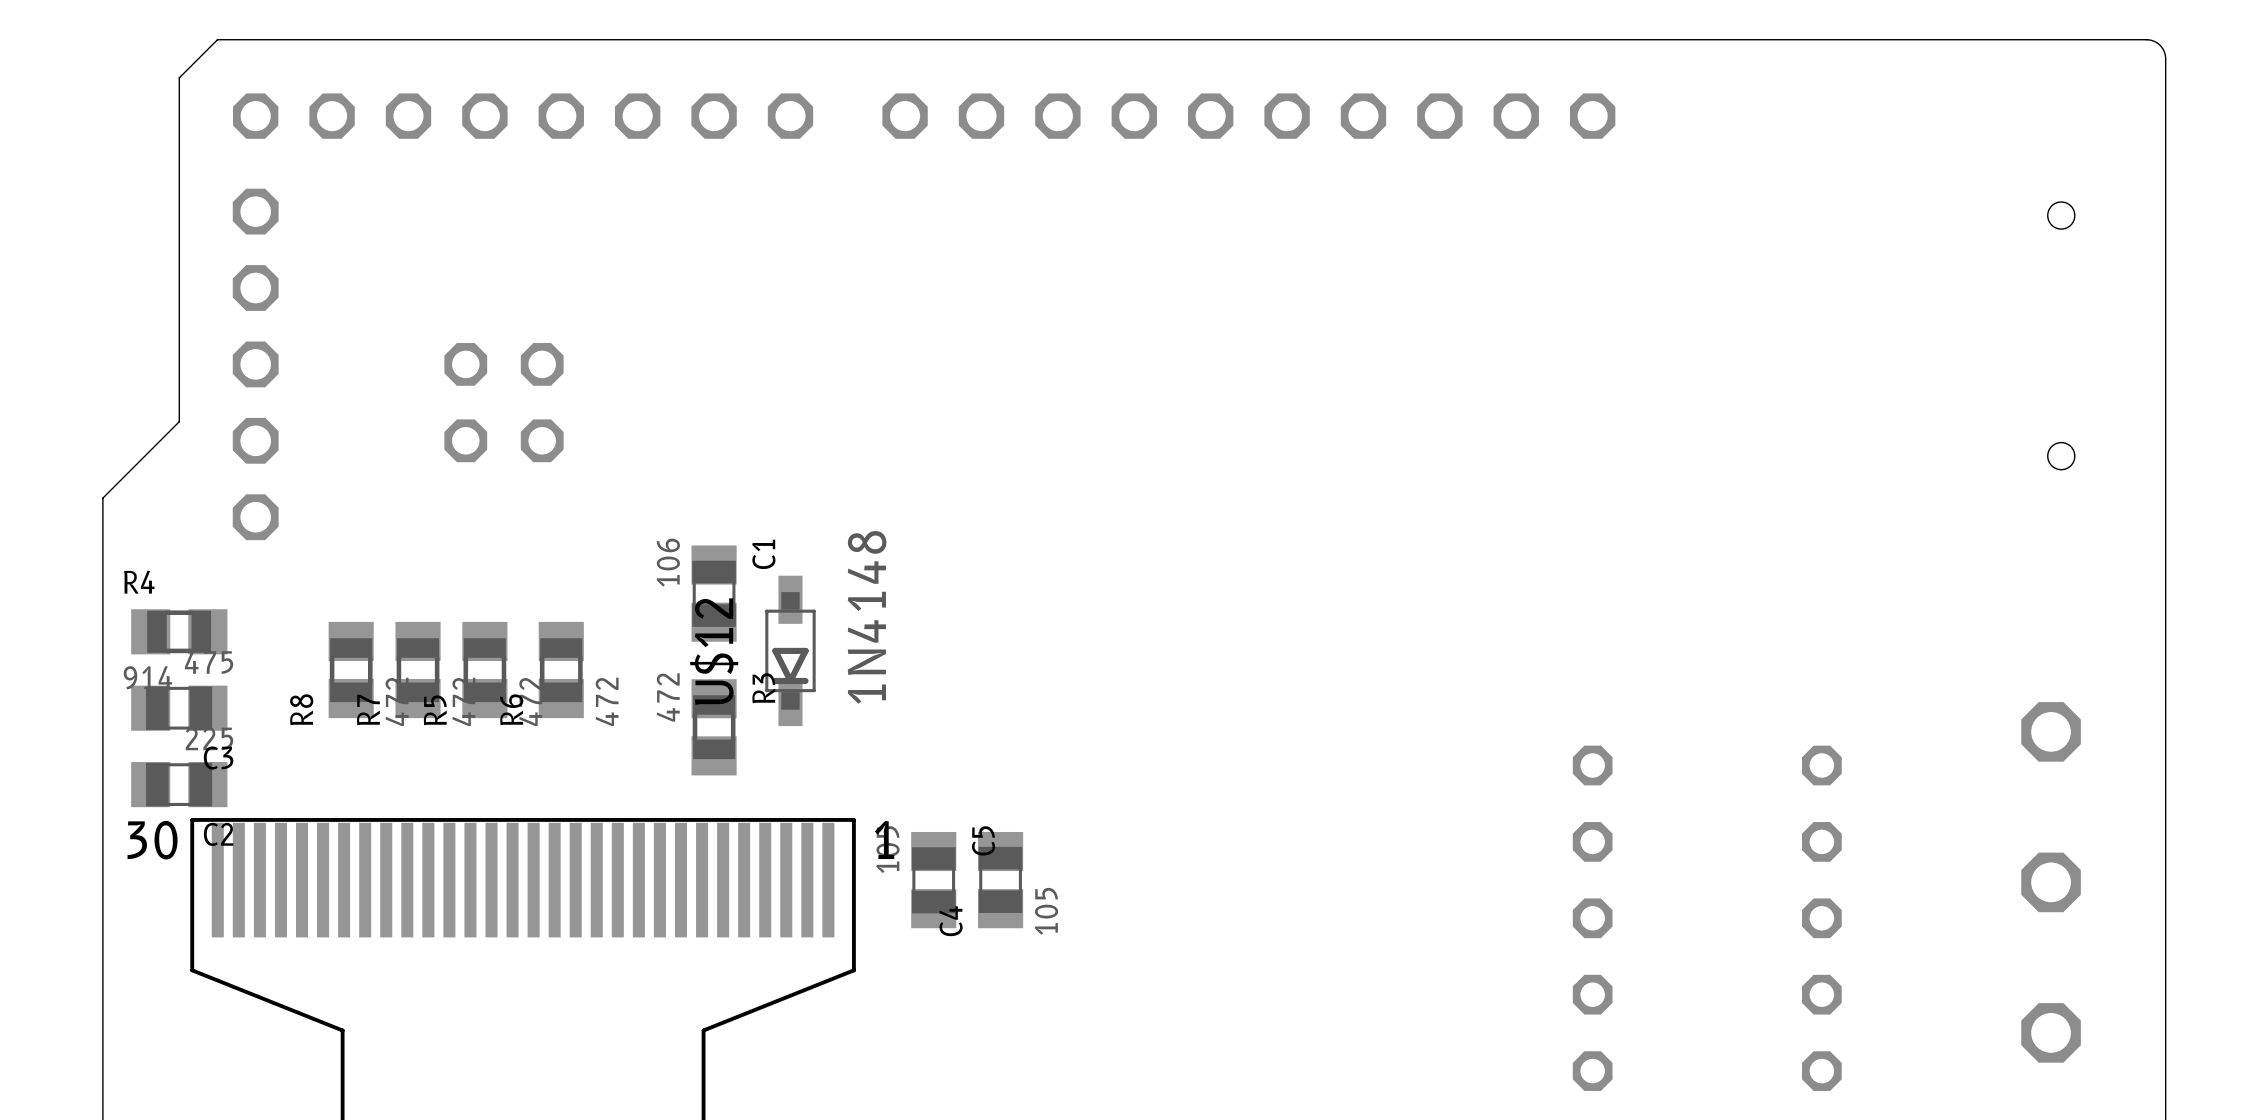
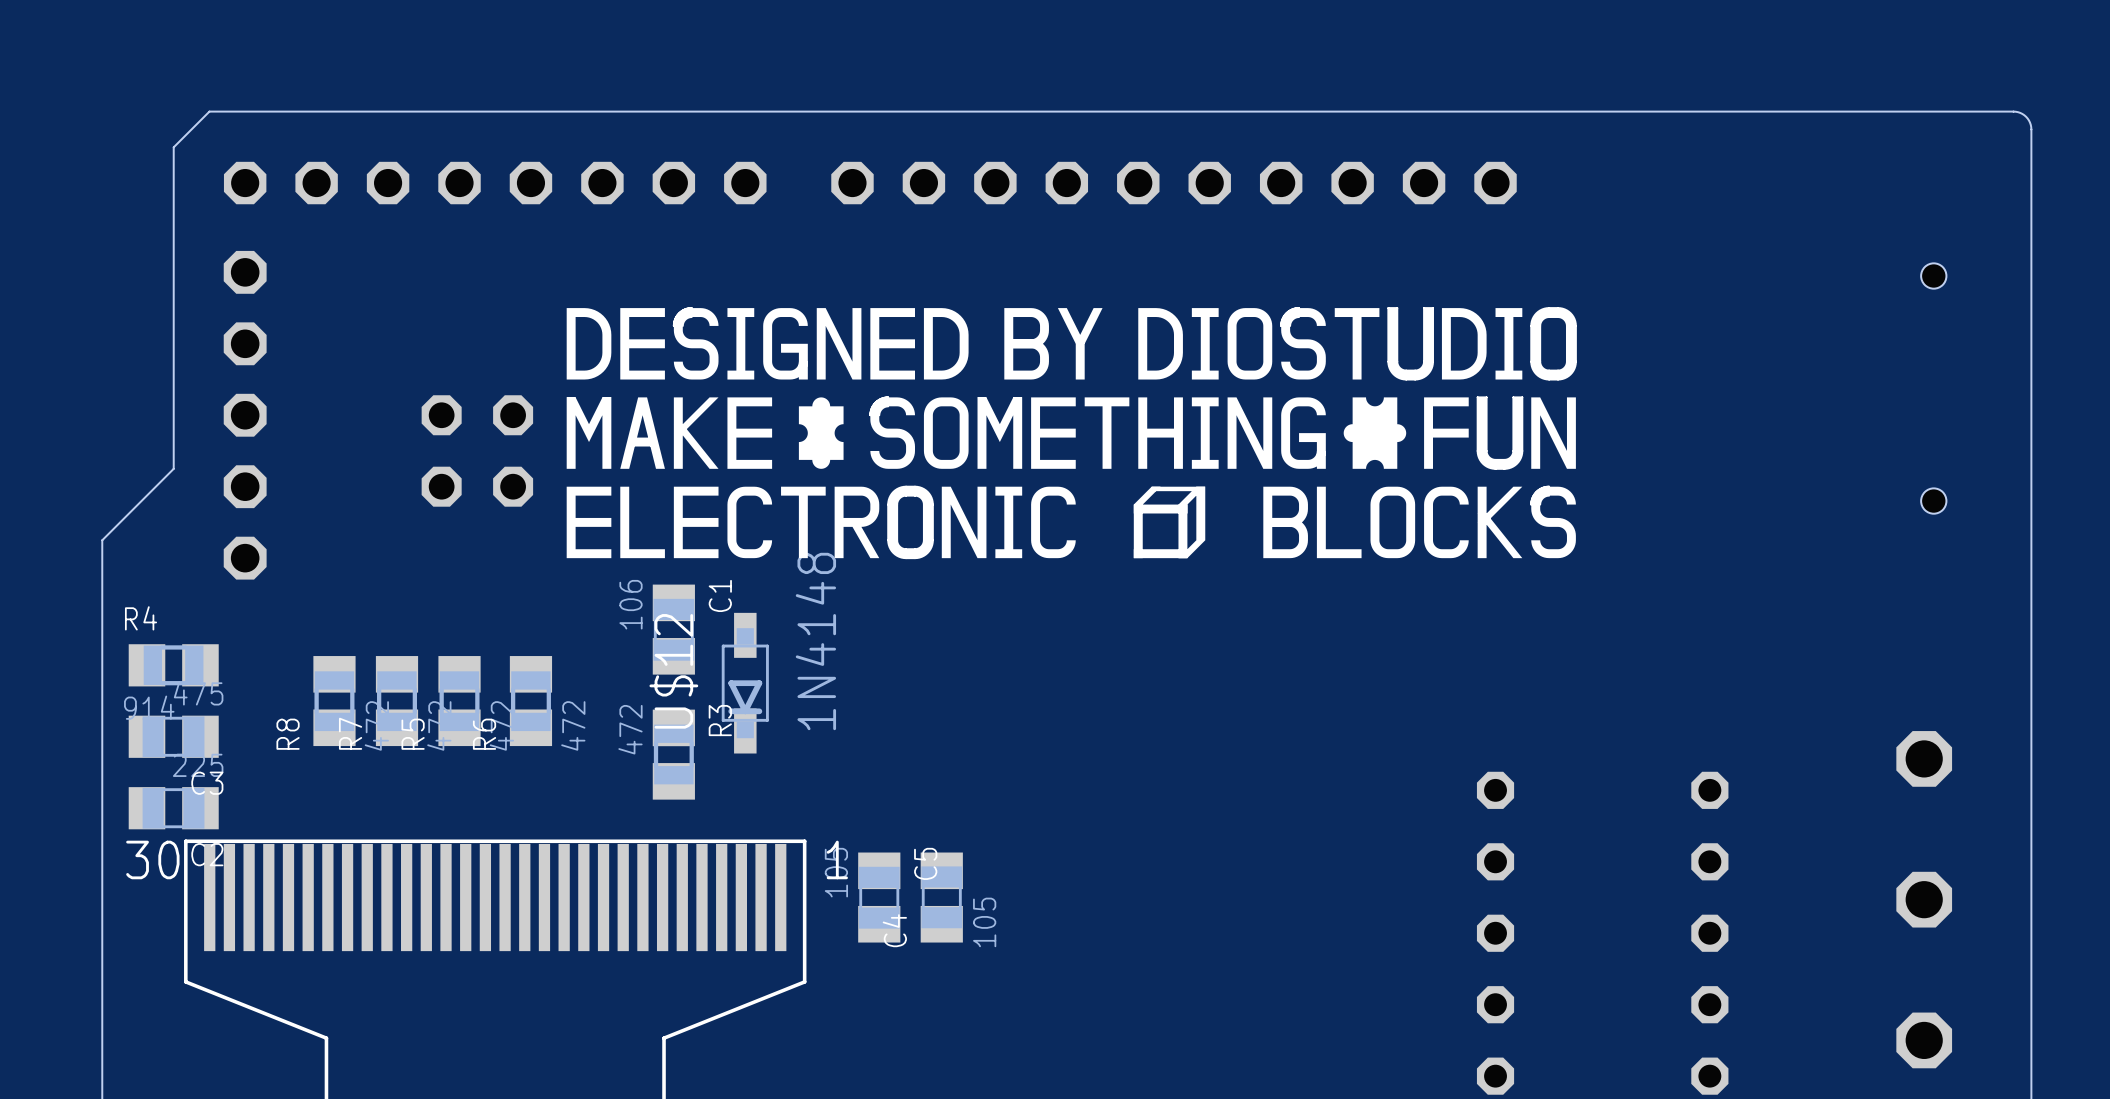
drawing: none -> [566, 308, 1576, 559]

